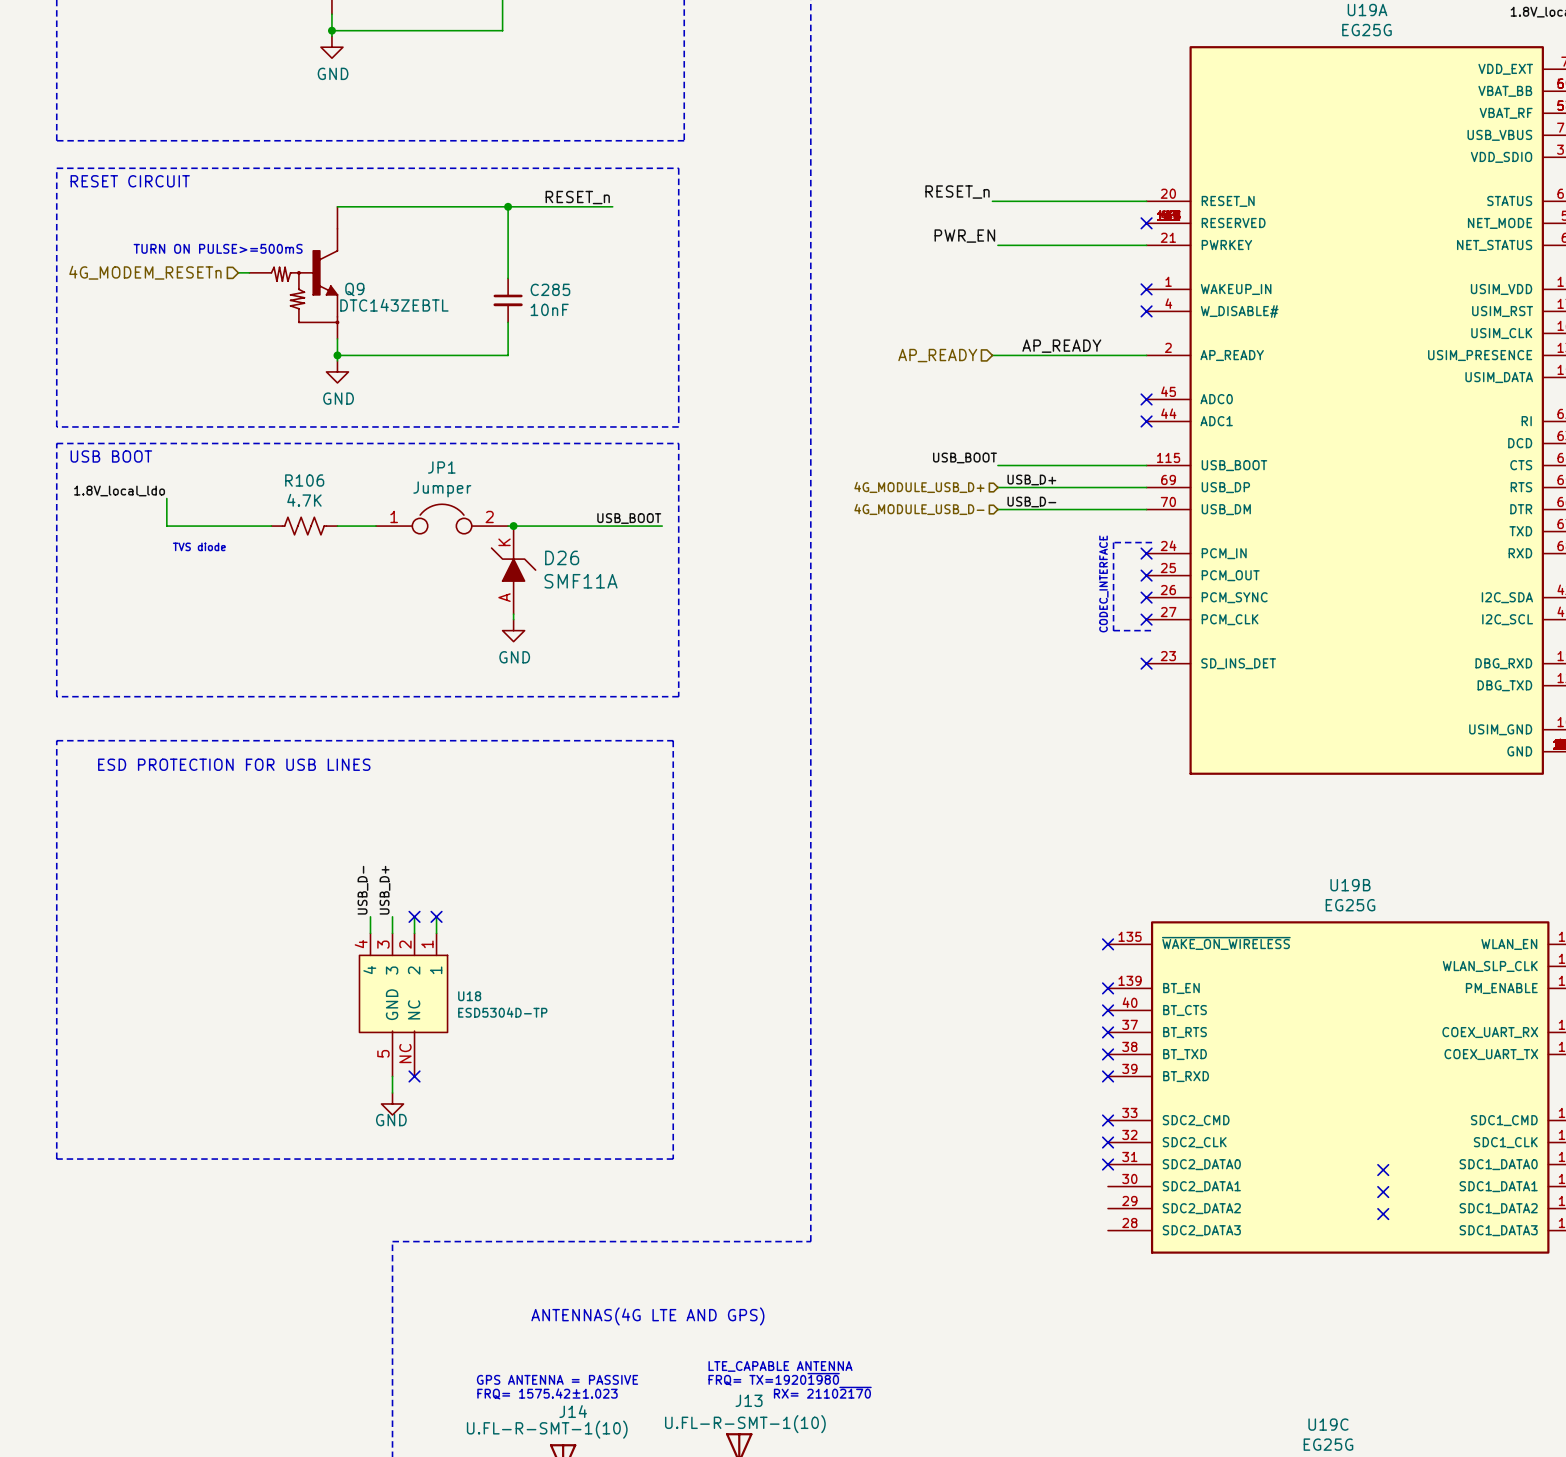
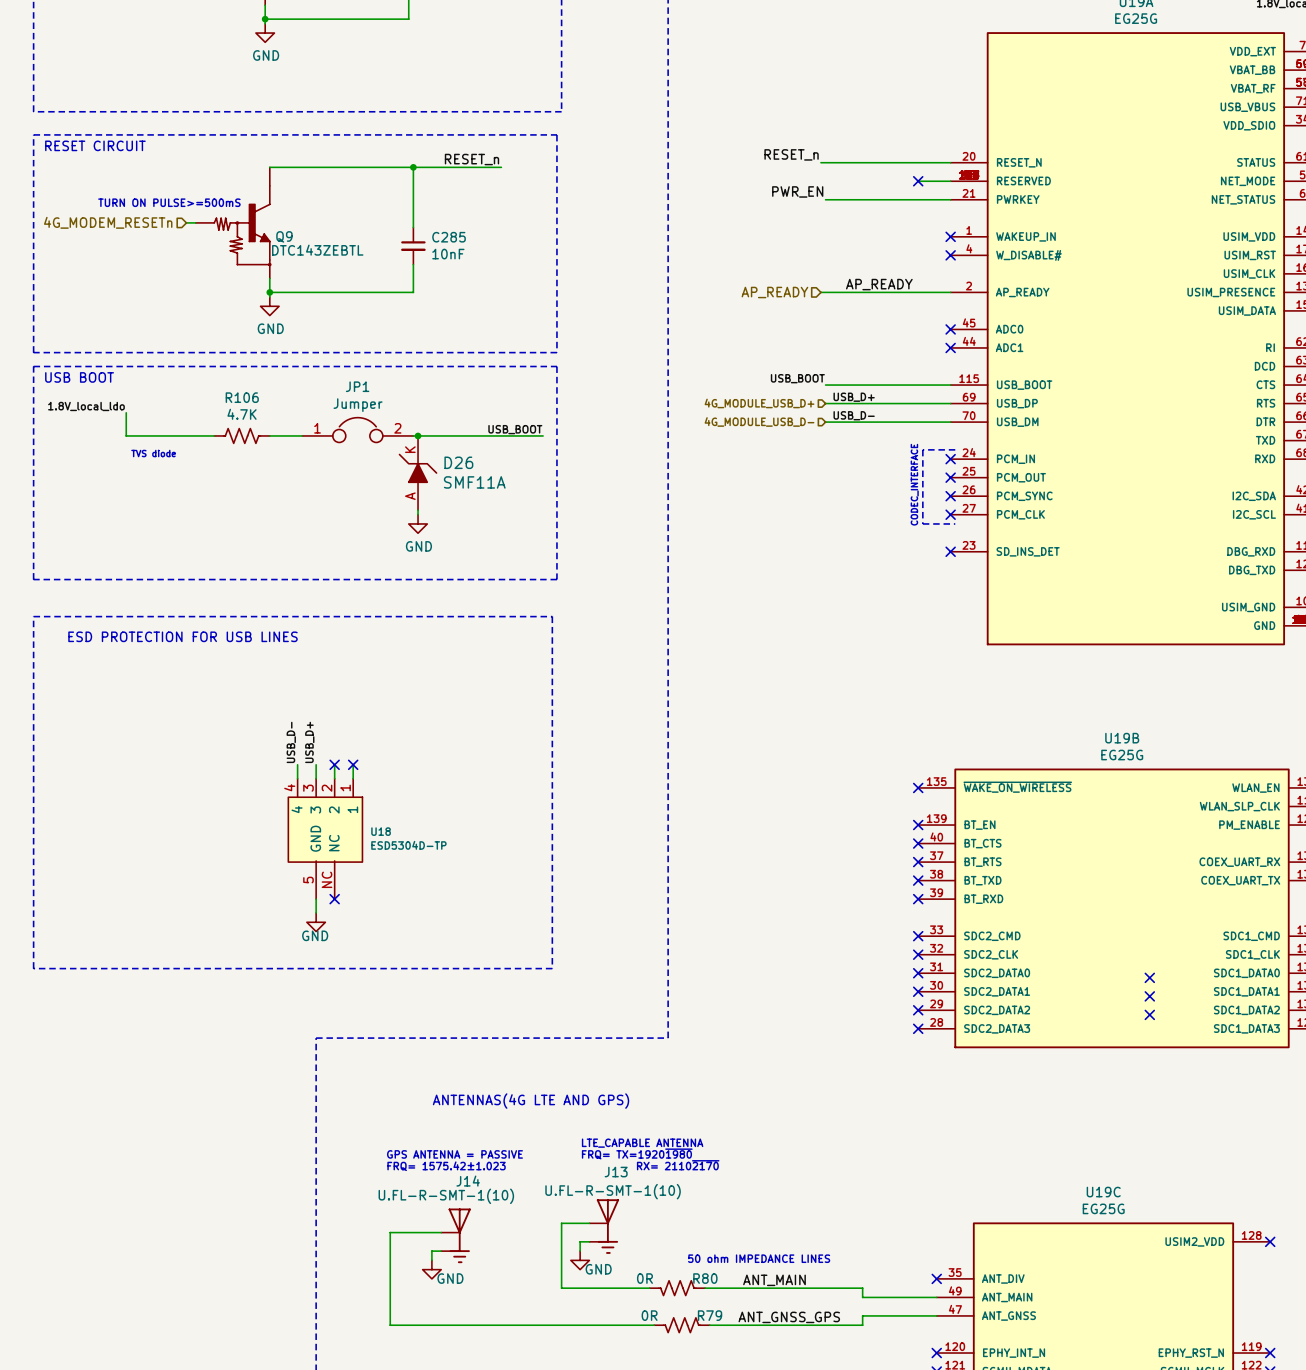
wire: none -> (918, 181) (950, 181)
no-connect mark position: (1146, 223) -> (918, 181)
no-connect mark: none -> (918, 991)
no-connect mark: none -> (918, 1010)
no-connect mark: none -> (918, 1028)

